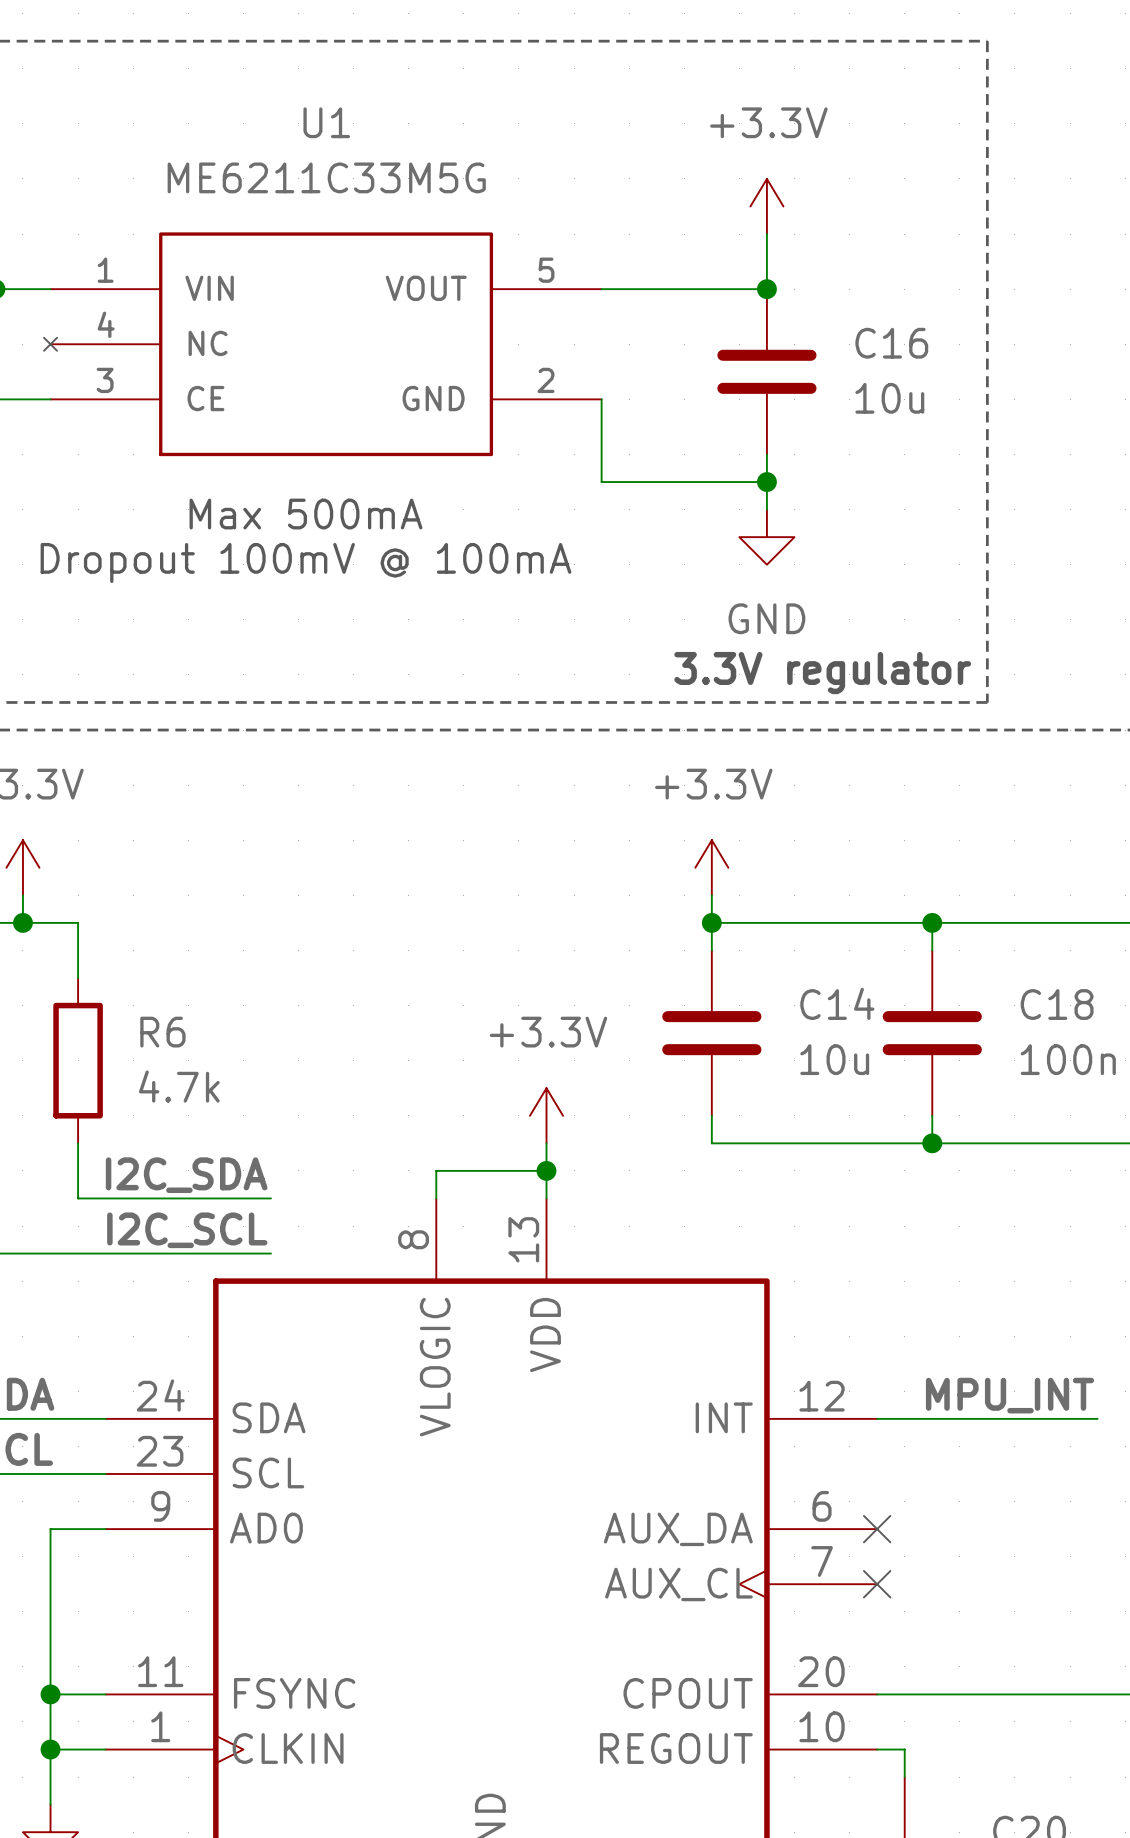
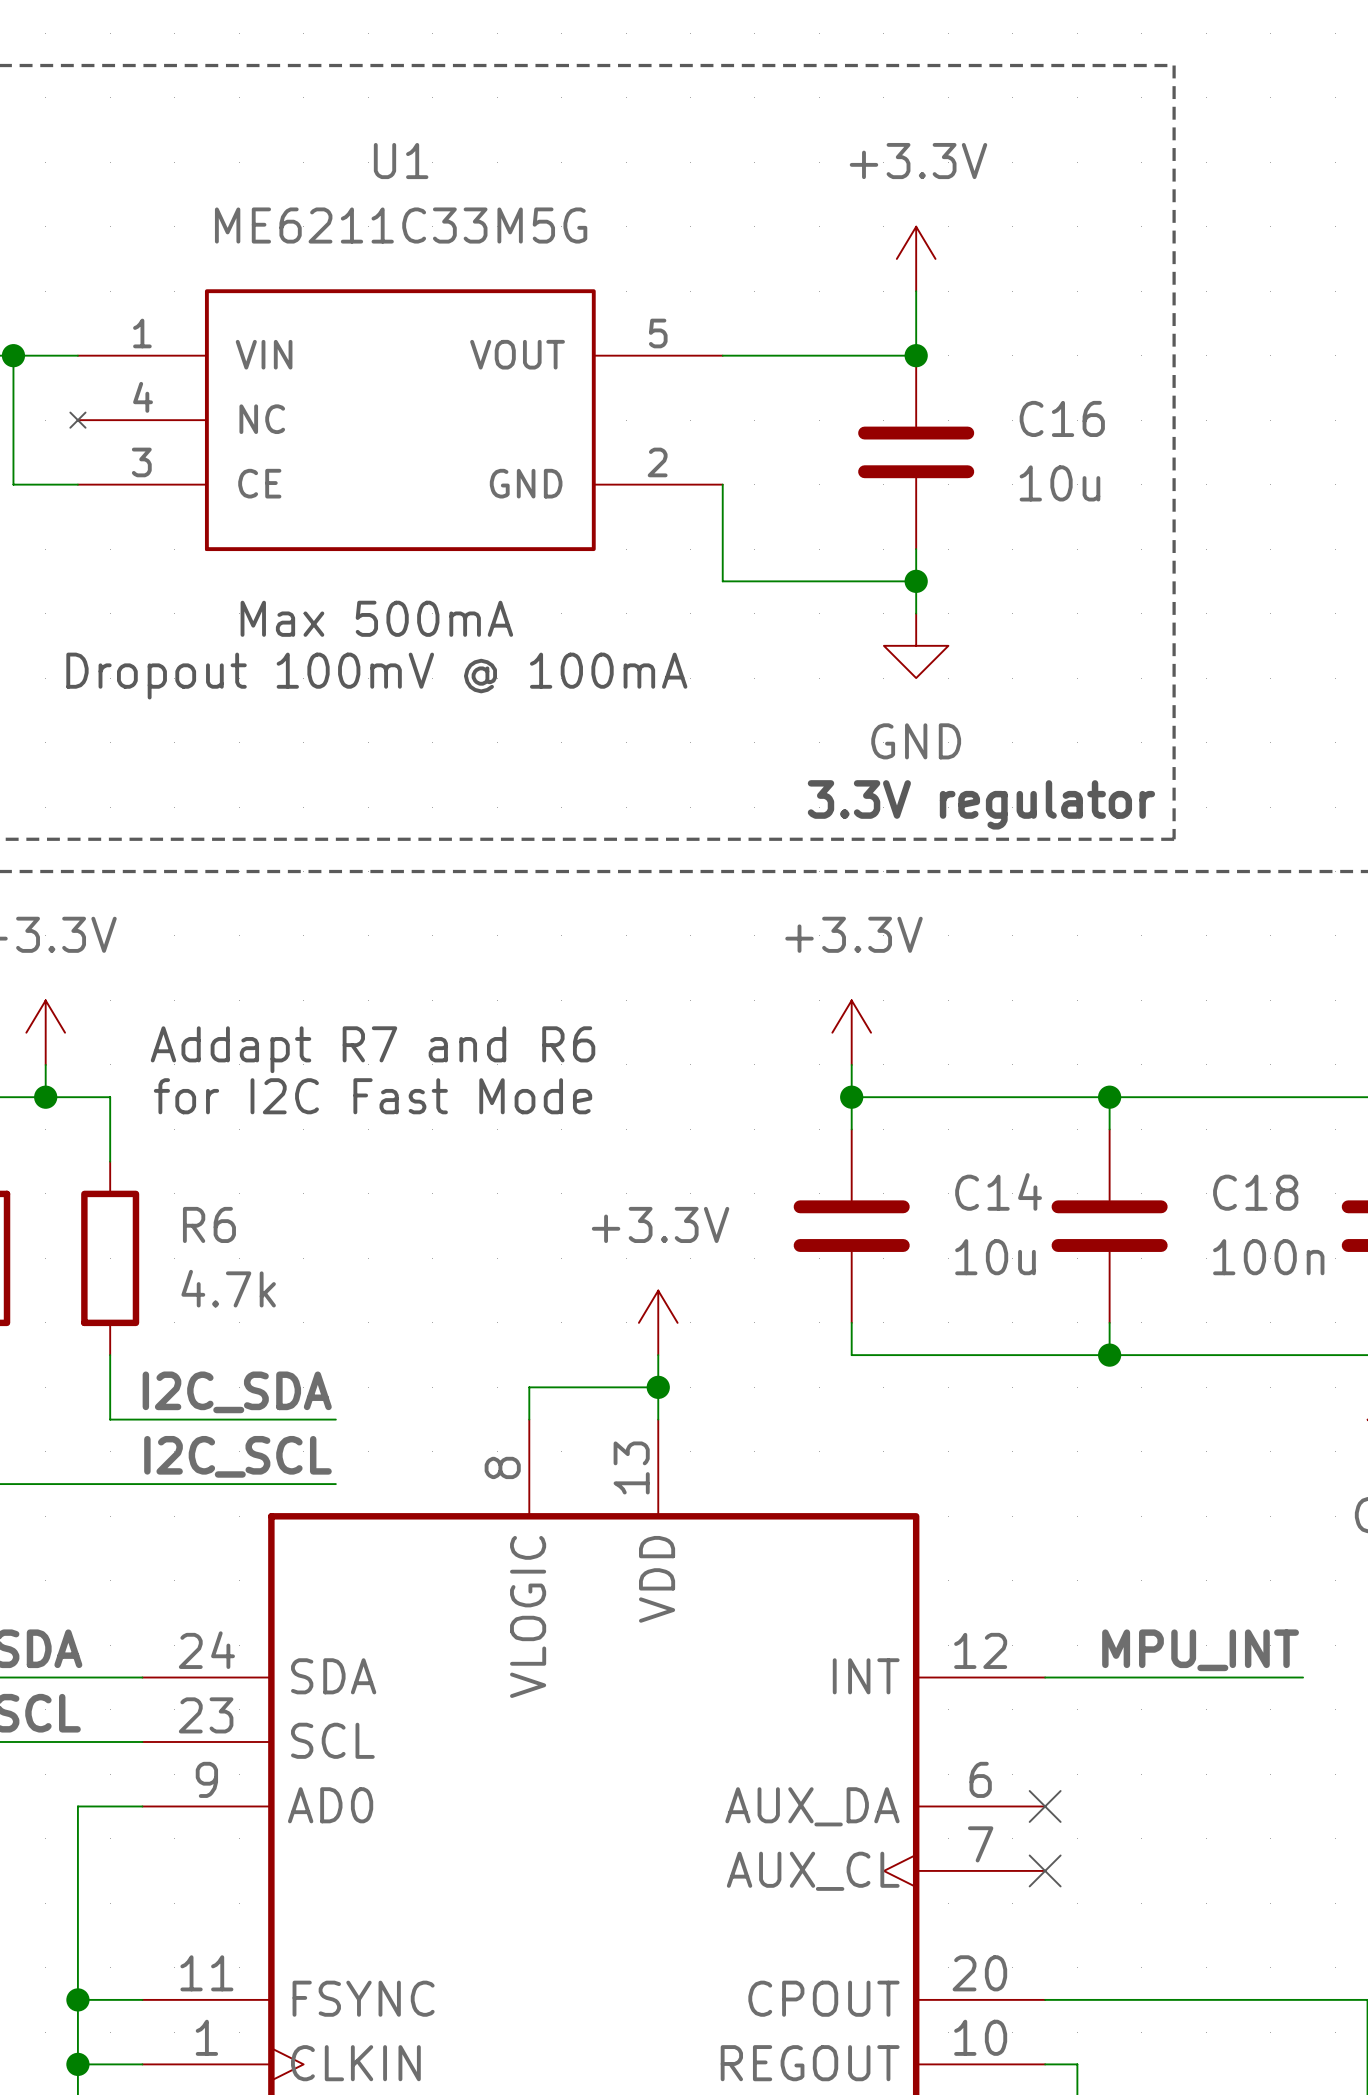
text: none -> Addapt R7 and R6 (373, 1049)
text: none -> for I2C Fast Mode (373, 1096)

